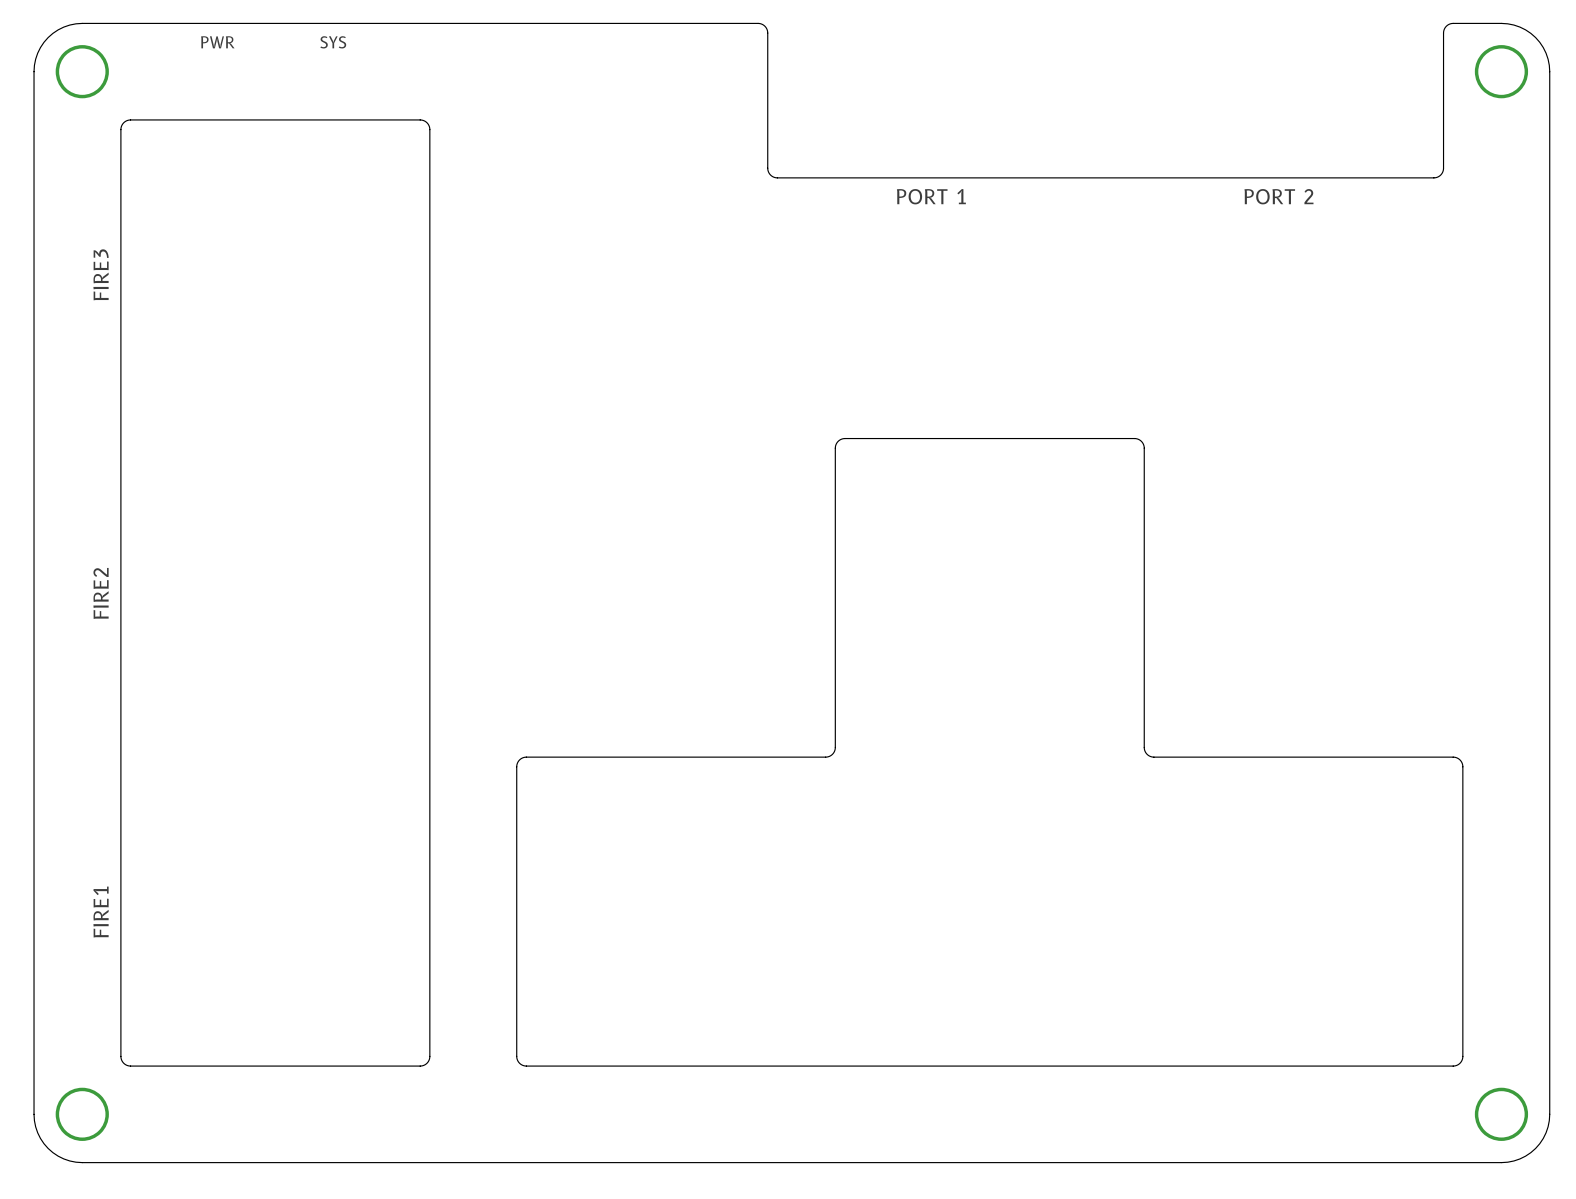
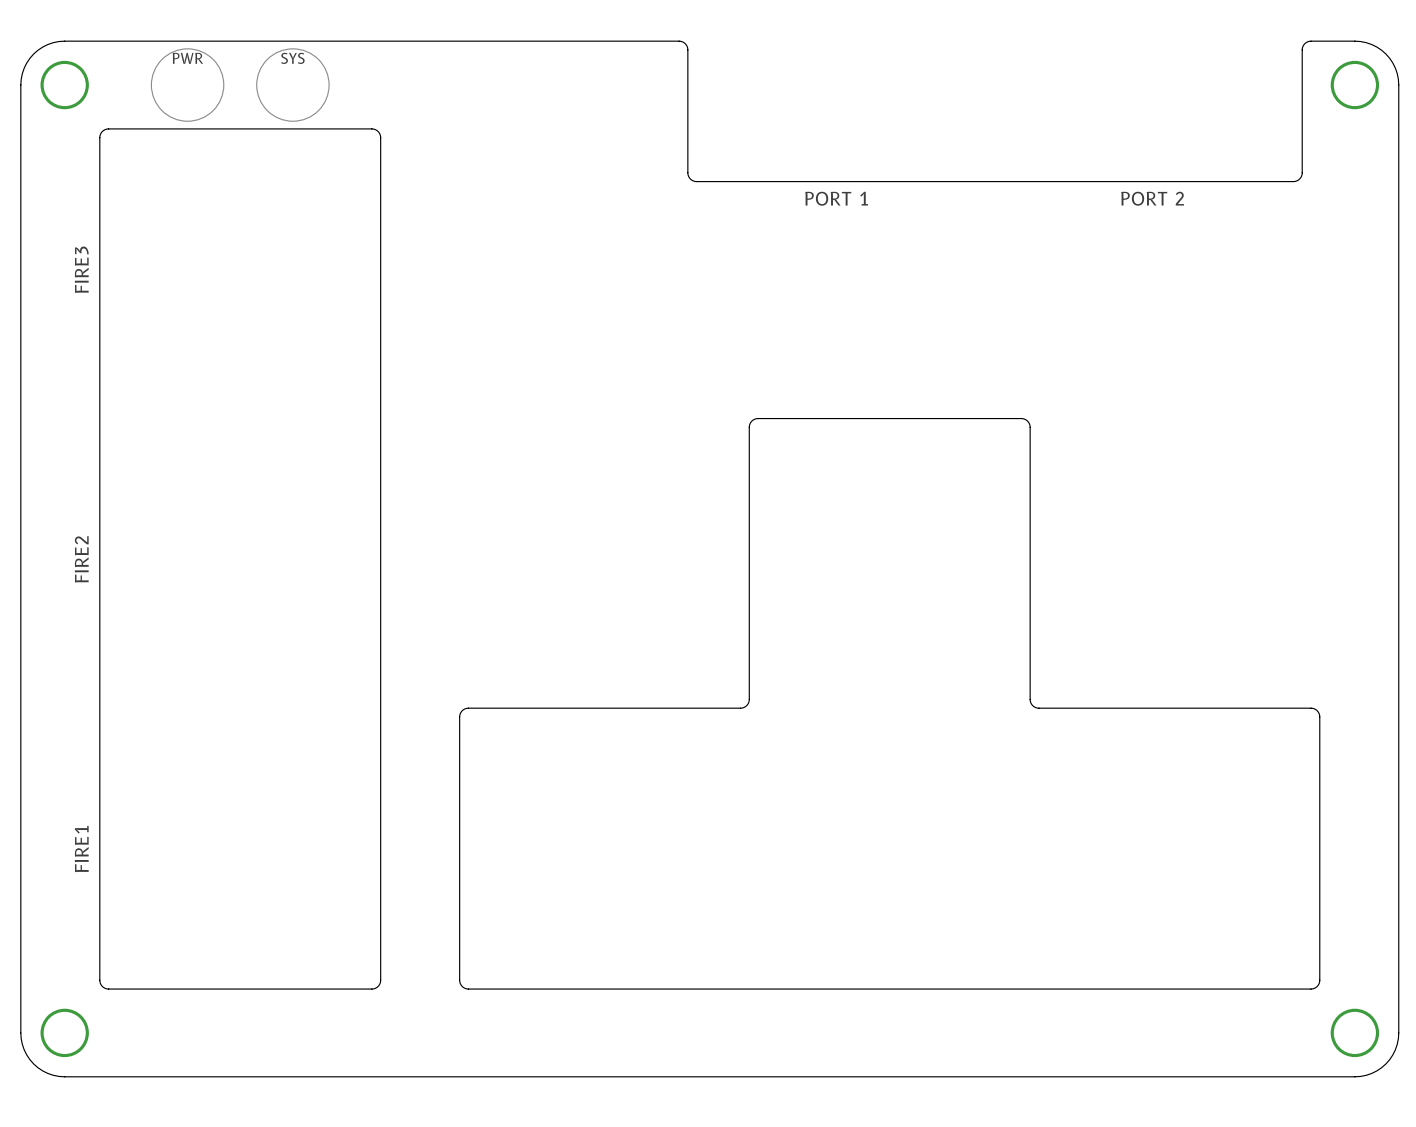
drawing: none -> [151, 48, 225, 122]
drawing: none -> [256, 48, 330, 122]

